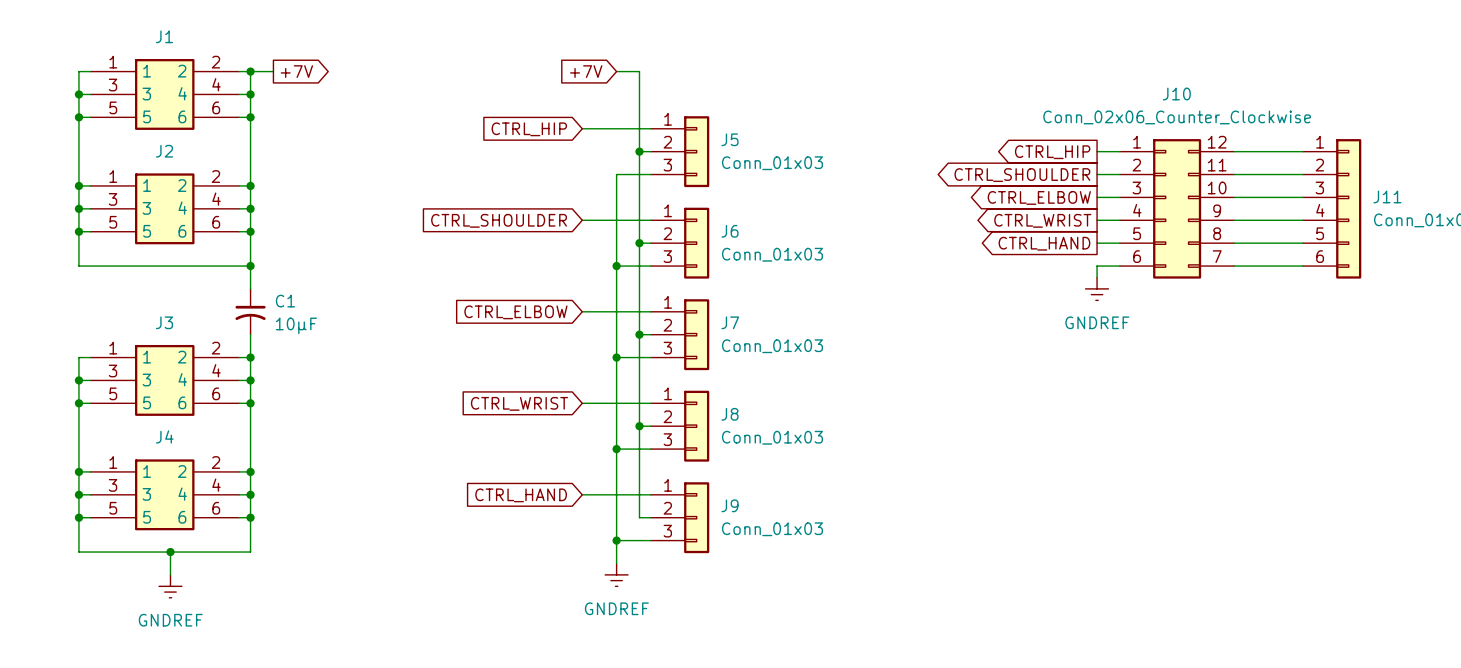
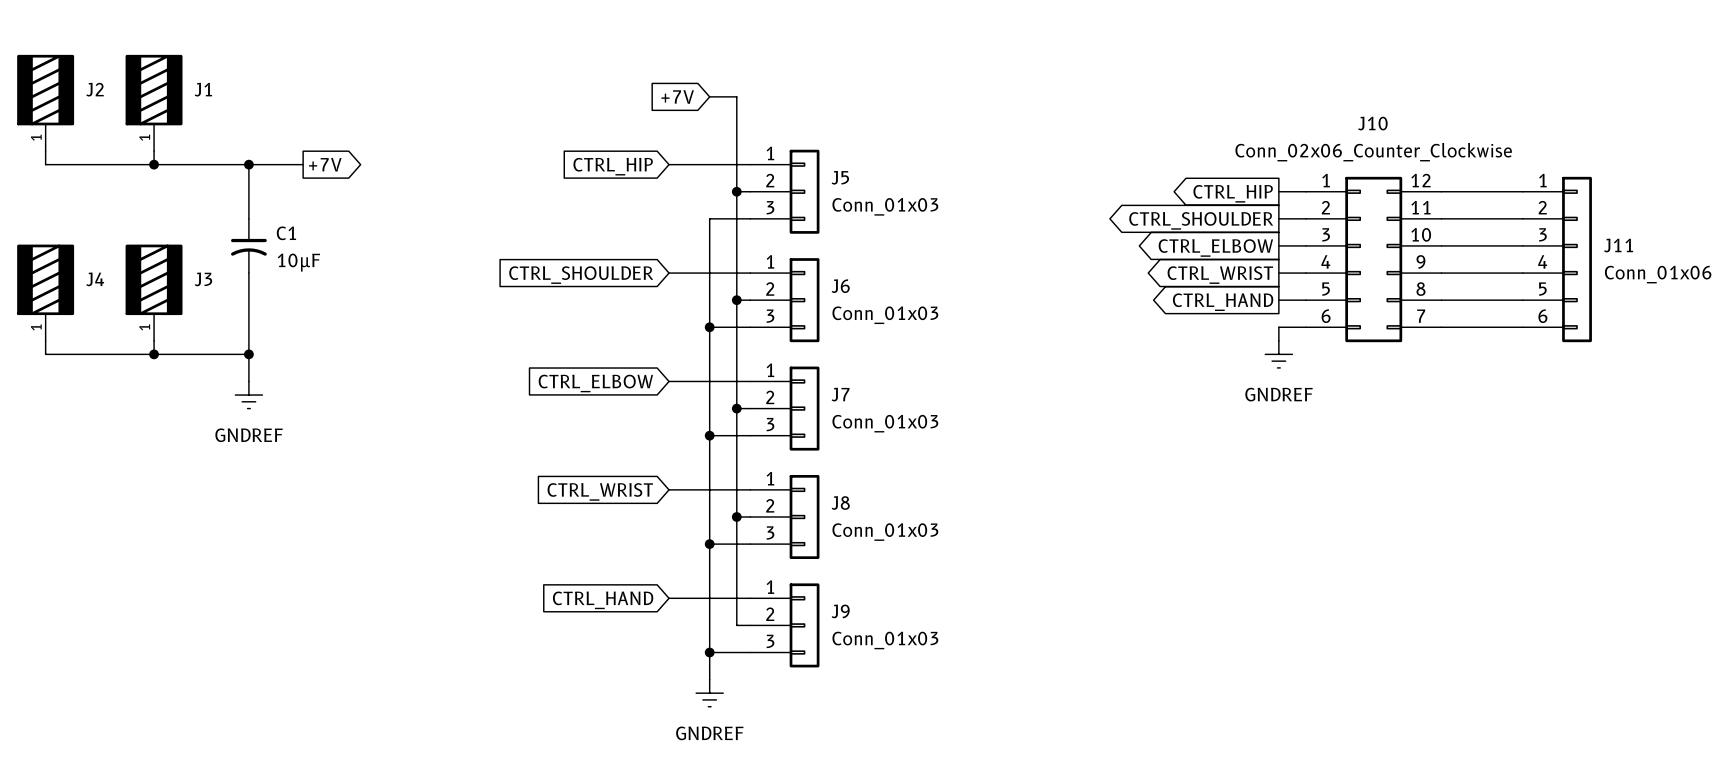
J1 name position: J1 (164, 36) -> J1 (203, 89)
J1 symbol: [90, 58, 240, 130] -> [125, 54, 183, 152]
wire: (90, 71) (78, 71) (78, 266) (250, 266) -> none
wire: (239, 71) (273, 71) -> none
wire: (250, 71) (250, 288) -> none
junction: (250, 71) -> none
global label position: +7V (296, 71) -> +7V (325, 164)
wire: (78, 94) (90, 94) -> none
junction: (78, 94) -> none
wire: (239, 94) (250, 94) -> none
junction: (250, 94) -> none
wire: none -> (45, 151) (45, 164) (303, 164)
wire: (78, 117) (90, 117) -> none
junction: (78, 117) -> none
wire: (239, 117) (250, 117) -> none
junction: (250, 117) -> none
junction: none -> (154, 164)
wire: none -> (248, 164) (248, 218)
junction: none -> (248, 164)
J2 name position: J2 (164, 151) -> J2 (95, 89)
J2 symbol: [90, 173, 240, 245] -> [17, 54, 75, 152]
wire: (78, 185) (90, 185) -> none
junction: (78, 185) -> none
wire: (239, 185) (250, 185) -> none
junction: (250, 185) -> none
wire: (78, 208) (90, 208) -> none
junction: (78, 208) -> none
wire: (239, 208) (250, 208) -> none
junction: (250, 208) -> none
wire: none -> (248, 273) (248, 381)
wire: (78, 231) (90, 231) -> none
junction: (78, 231) -> none
wire: (239, 231) (250, 231) -> none
junction: (250, 231) -> none
junction: (250, 266) -> none
wire: none -> (45, 340) (45, 354) (248, 354)
wire: none -> (154, 340) (154, 354)
junction: none -> (154, 354)
junction: none -> (248, 354)
C1 position: (250, 311) -> (248, 245)
J3 name position: J3 (164, 322) -> J3 (203, 279)
power symbol: none -> GNDREF (248, 395)
wire: (250, 334) (250, 552) (78, 552) (78, 357) (90, 357) -> none
J3 symbol: [90, 344, 240, 416] -> [125, 244, 183, 341]
wire: (239, 357) (250, 357) -> none
junction: (250, 357) -> none
wire: (78, 380) (90, 380) -> none
junction: (78, 380) -> none
wire: (239, 380) (250, 380) -> none
junction: (250, 380) -> none
wire: (78, 403) (90, 403) -> none
junction: (78, 403) -> none
wire: (239, 403) (250, 403) -> none
junction: (250, 403) -> none
J4 name position: J4 (164, 436) -> J4 (95, 279)
J4 symbol: [90, 459, 240, 531] -> [17, 244, 75, 341]
wire: (78, 471) (90, 471) -> none
junction: (78, 471) -> none
wire: (239, 471) (250, 471) -> none
junction: (250, 471) -> none
wire: (78, 494) (90, 494) -> none
junction: (78, 494) -> none
wire: (239, 494) (250, 494) -> none
junction: (250, 494) -> none
wire: (78, 517) (90, 517) -> none
junction: (78, 517) -> none
wire: (239, 517) (250, 517) -> none
junction: (250, 517) -> none
wire: (170, 552) (170, 574) -> none
junction: (170, 552) -> none
power symbol: GNDREF (170, 586) -> none

